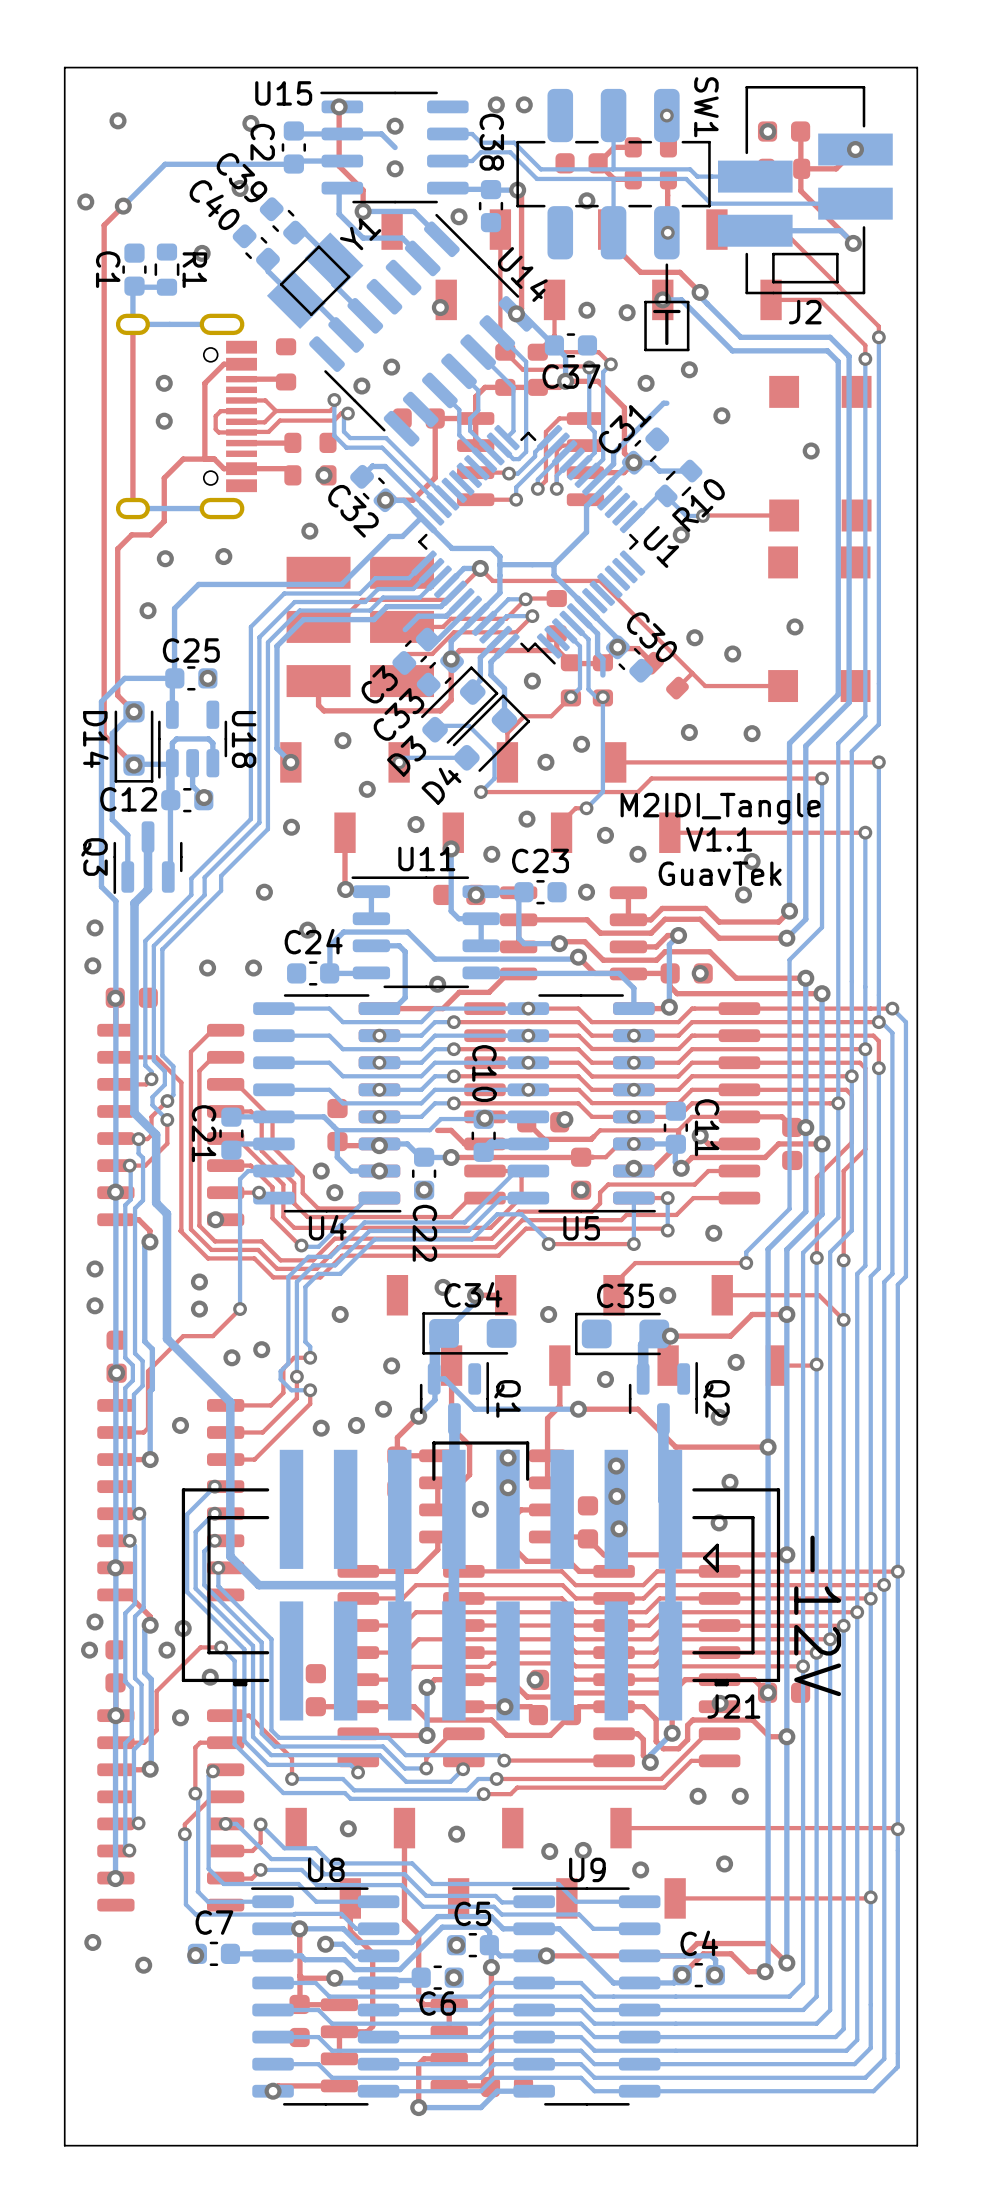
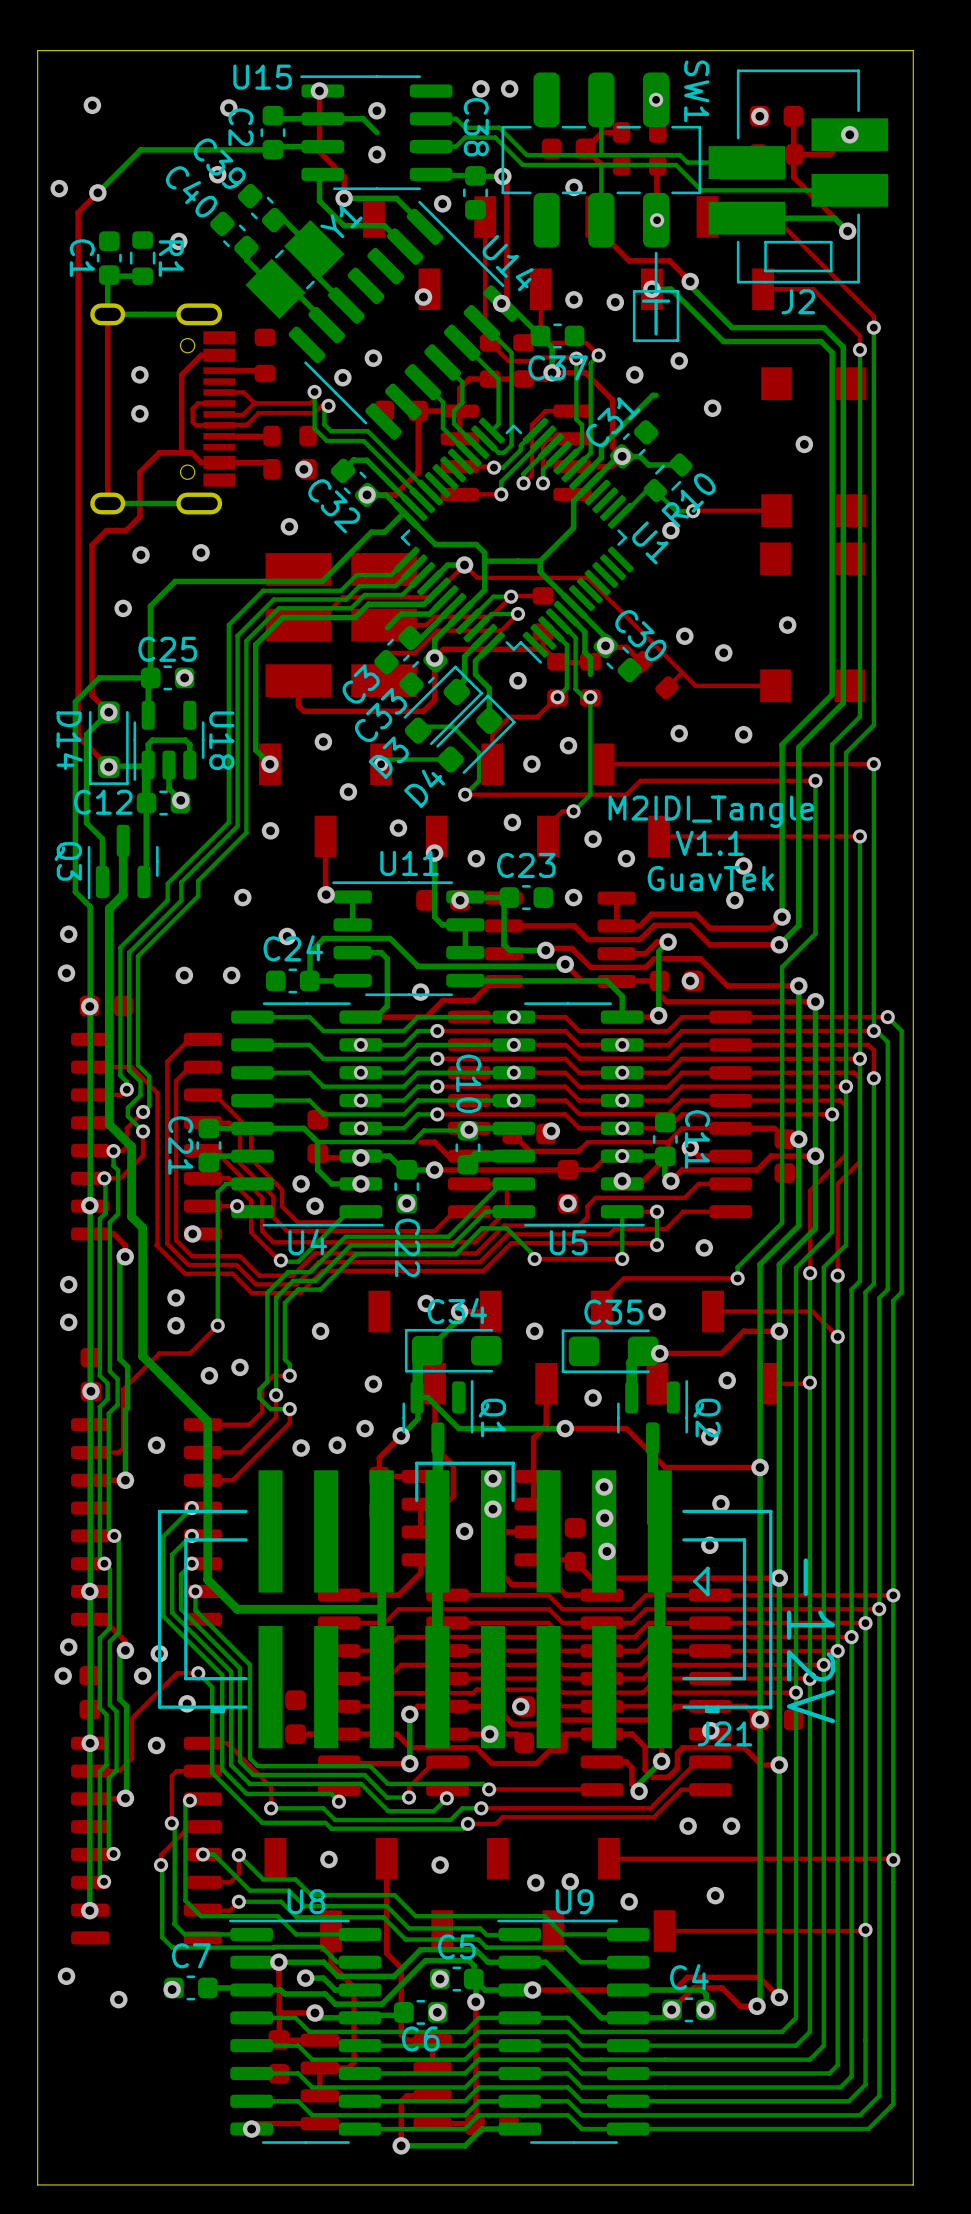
Y1 footprint: [266, 232, 364, 329] -> [245, 219, 345, 320]

